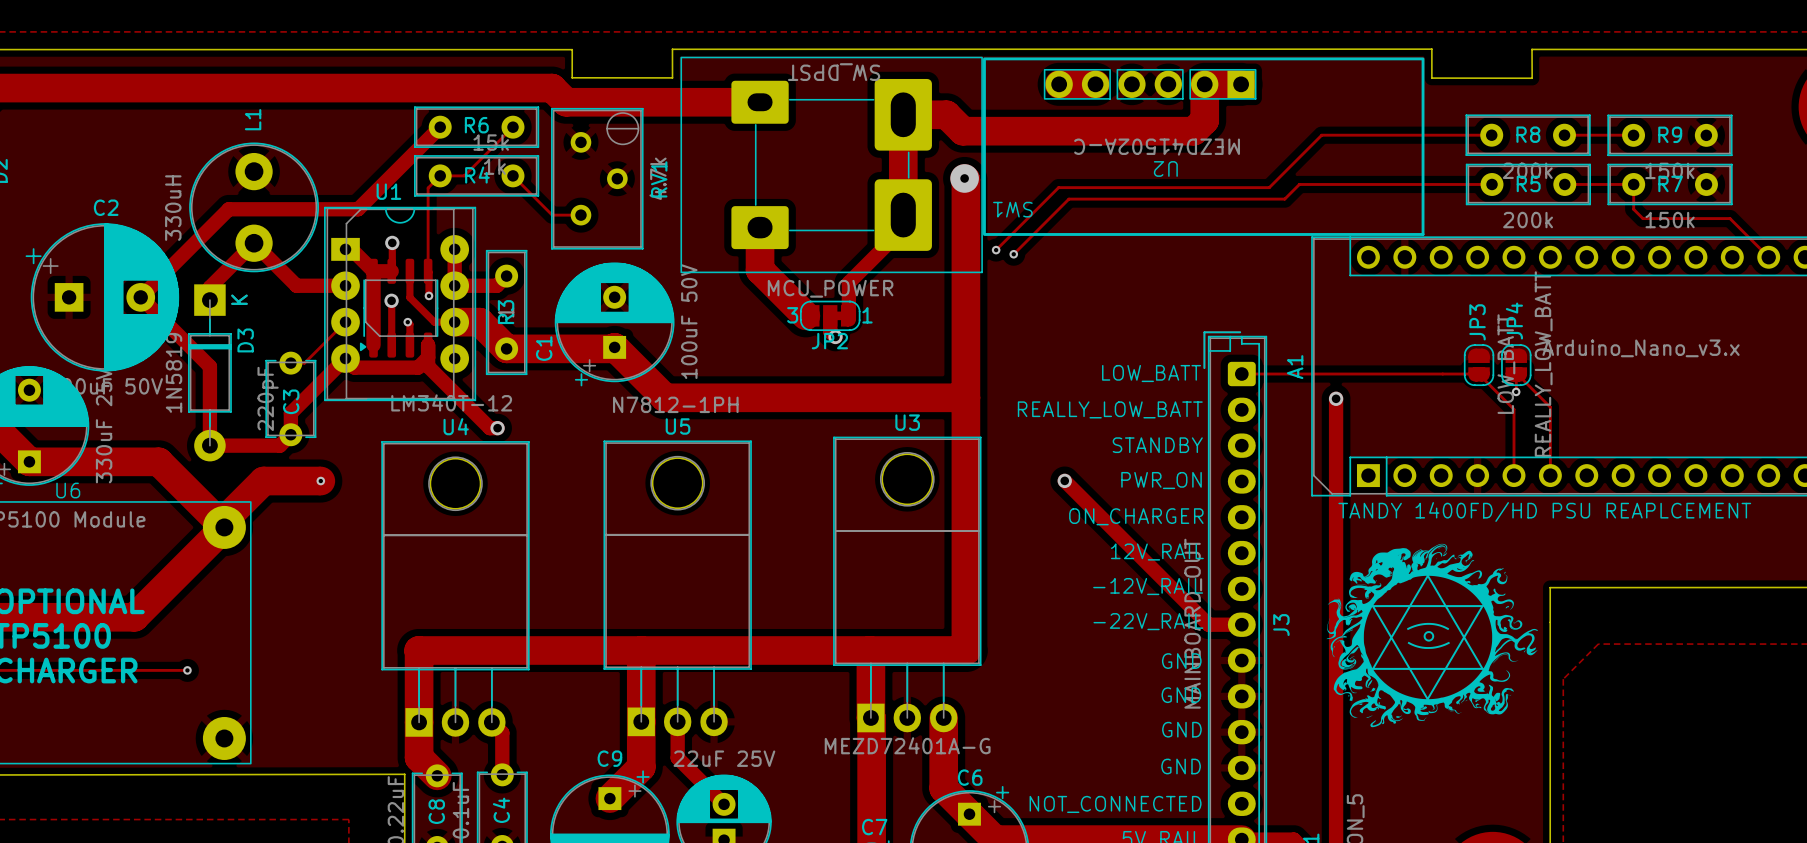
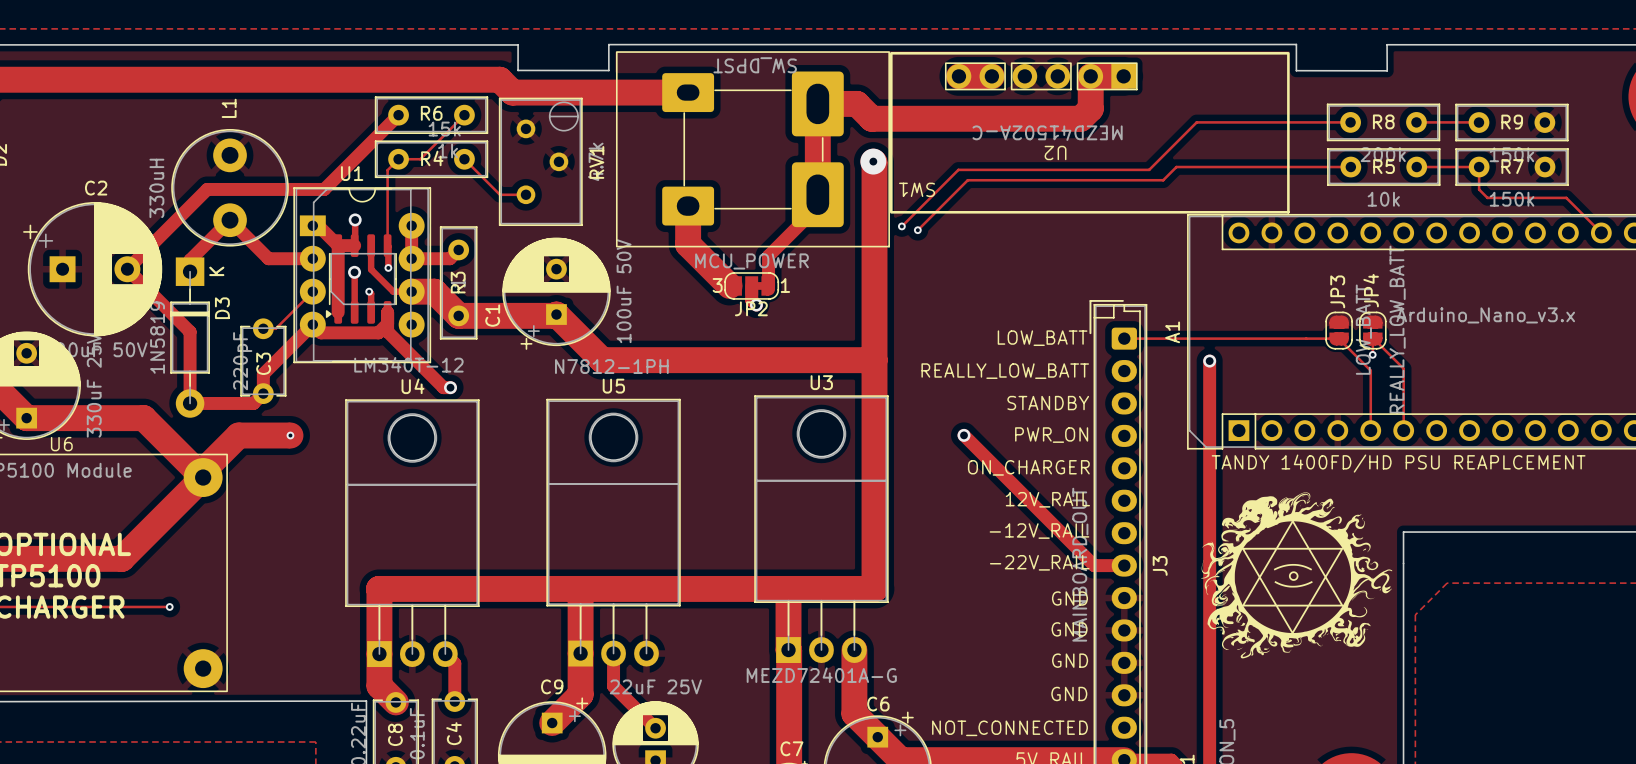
R5 value: 200k (1528, 220) -> 10k (1383, 199)

